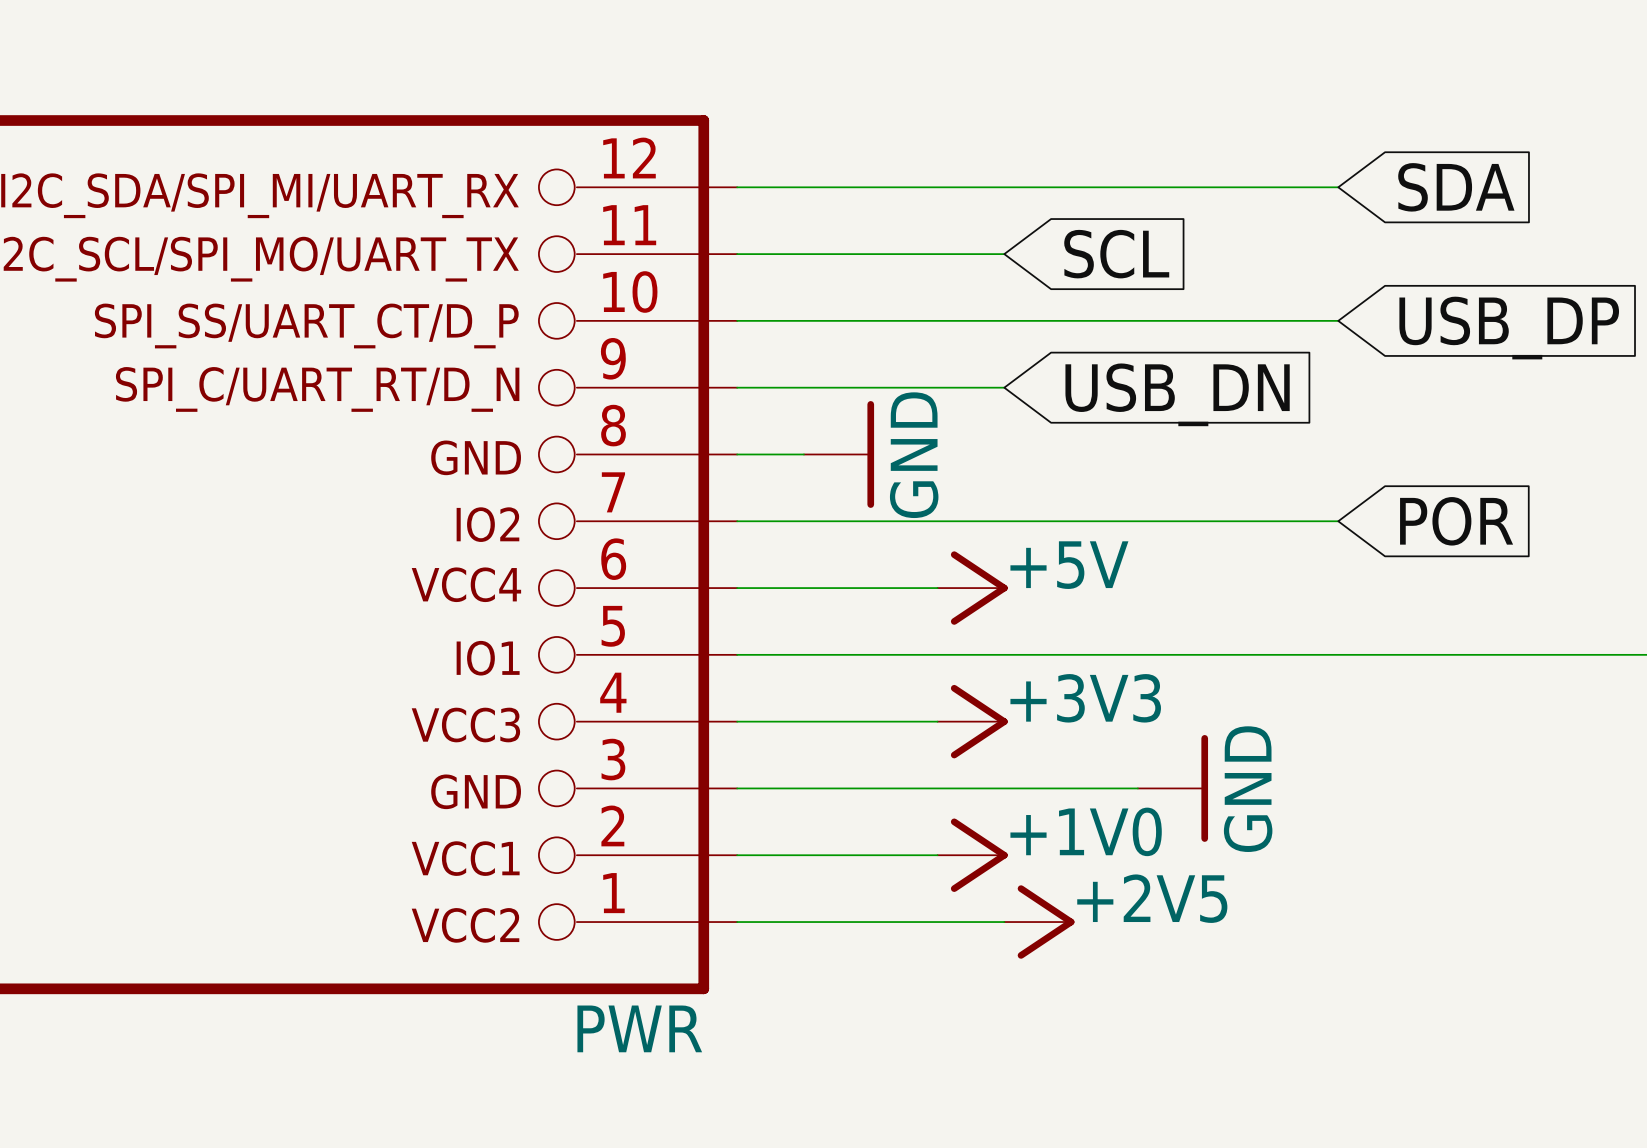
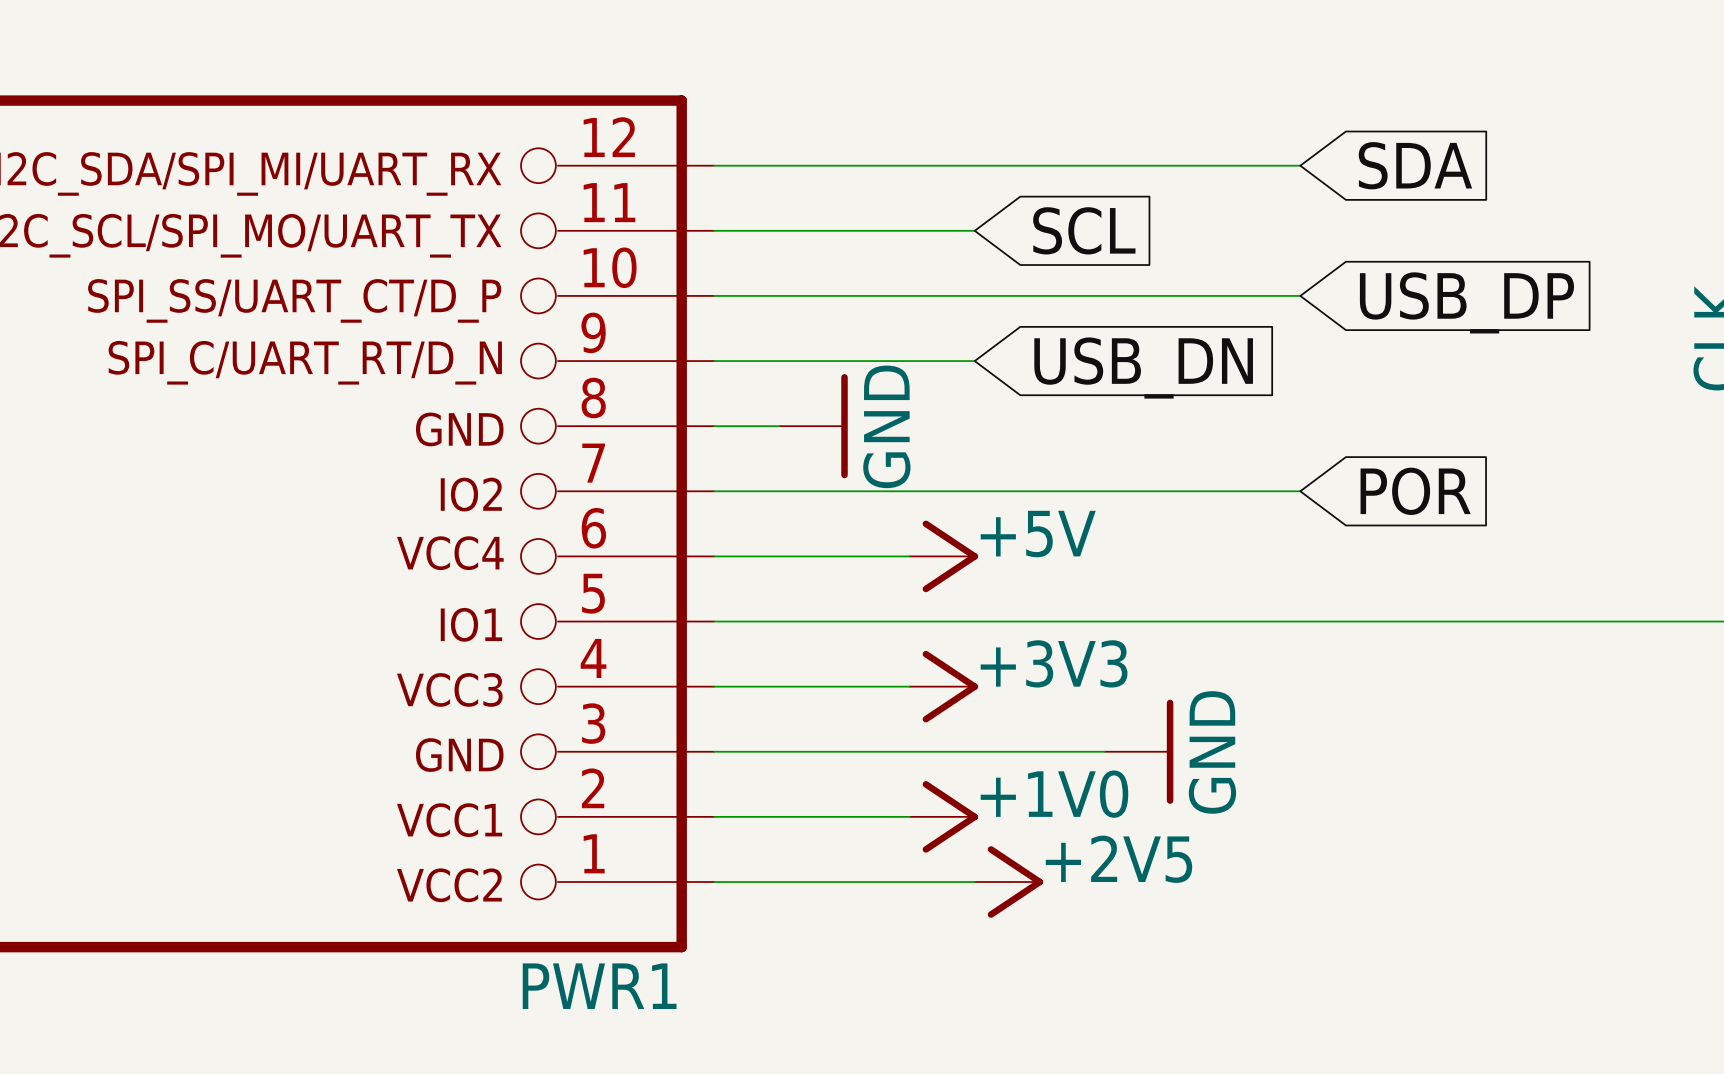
PWR name: PWR (639, 1028) -> PWR1 (599, 986)

